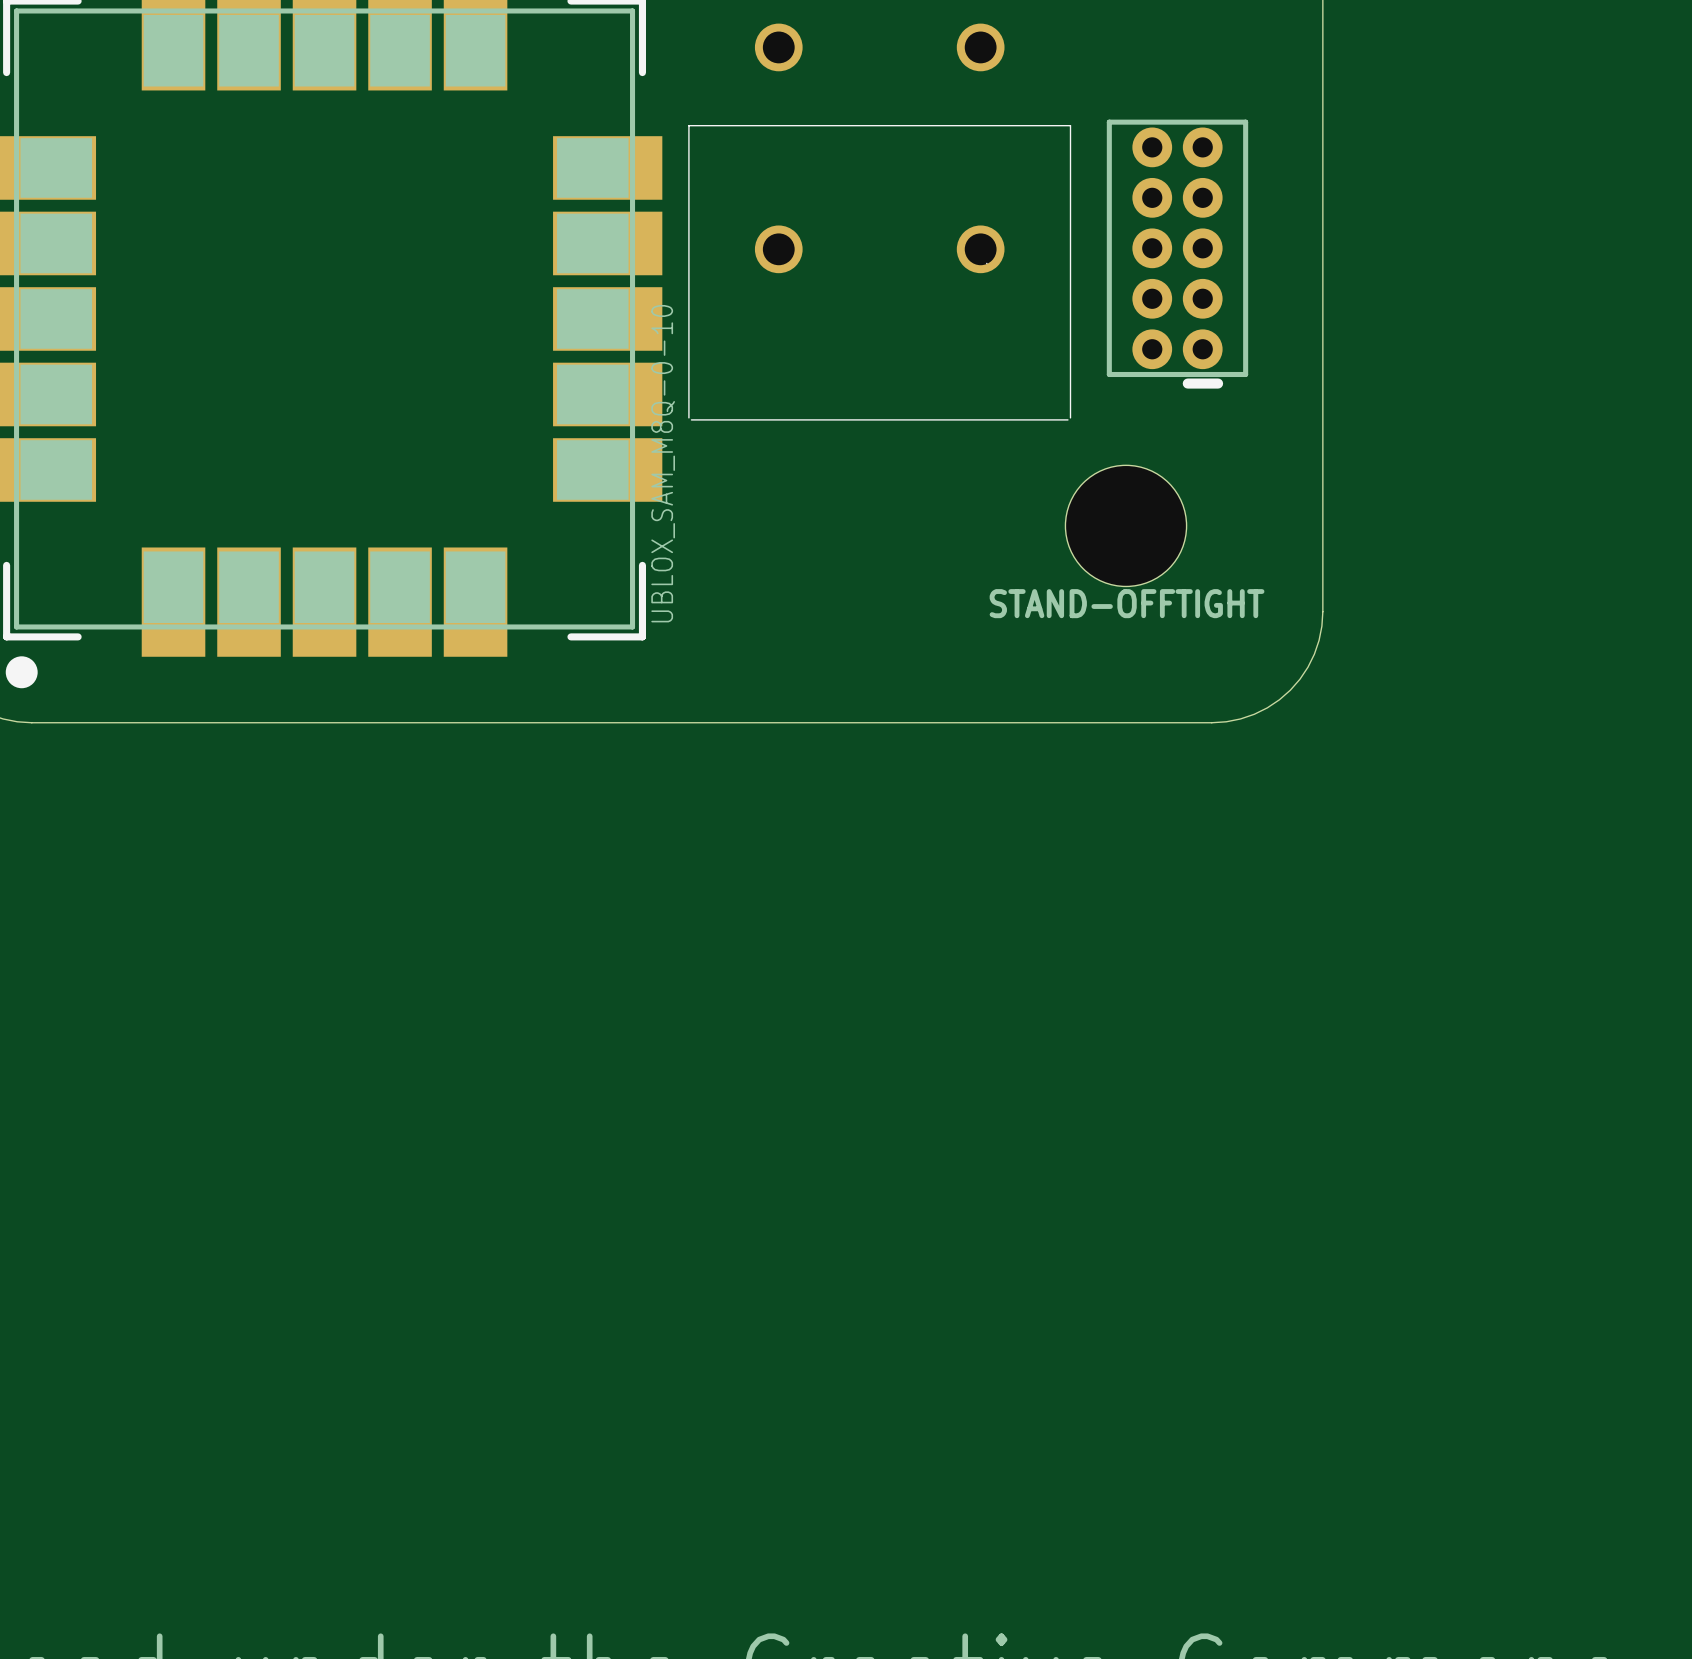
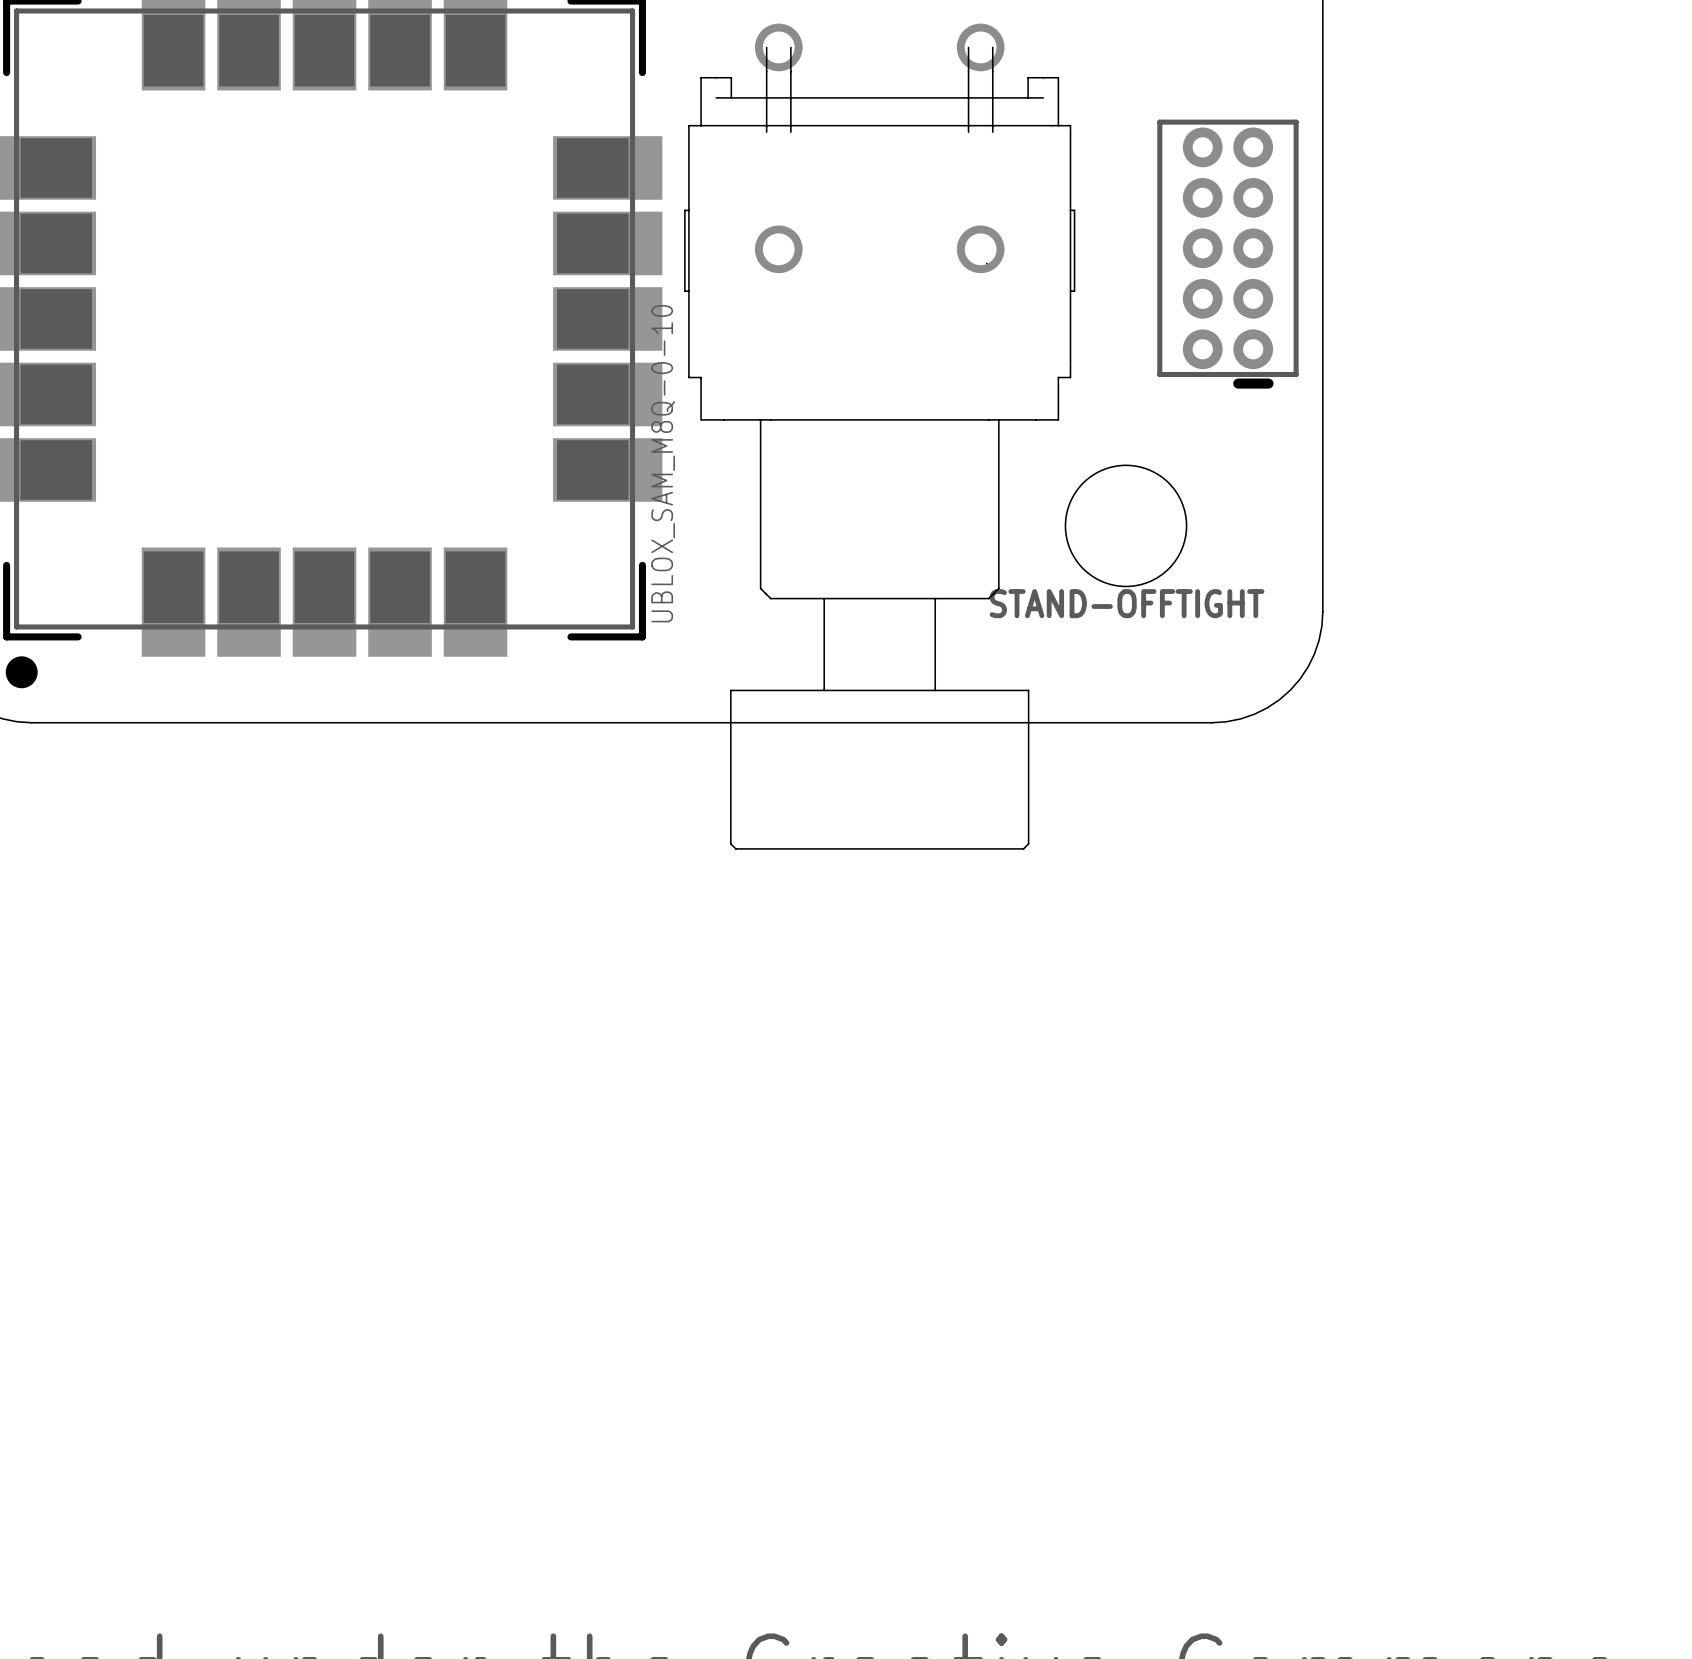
part: (879, 222) -> none
part position: (1177, 254) -> (1227, 254)
part: none -> (879, 436)

